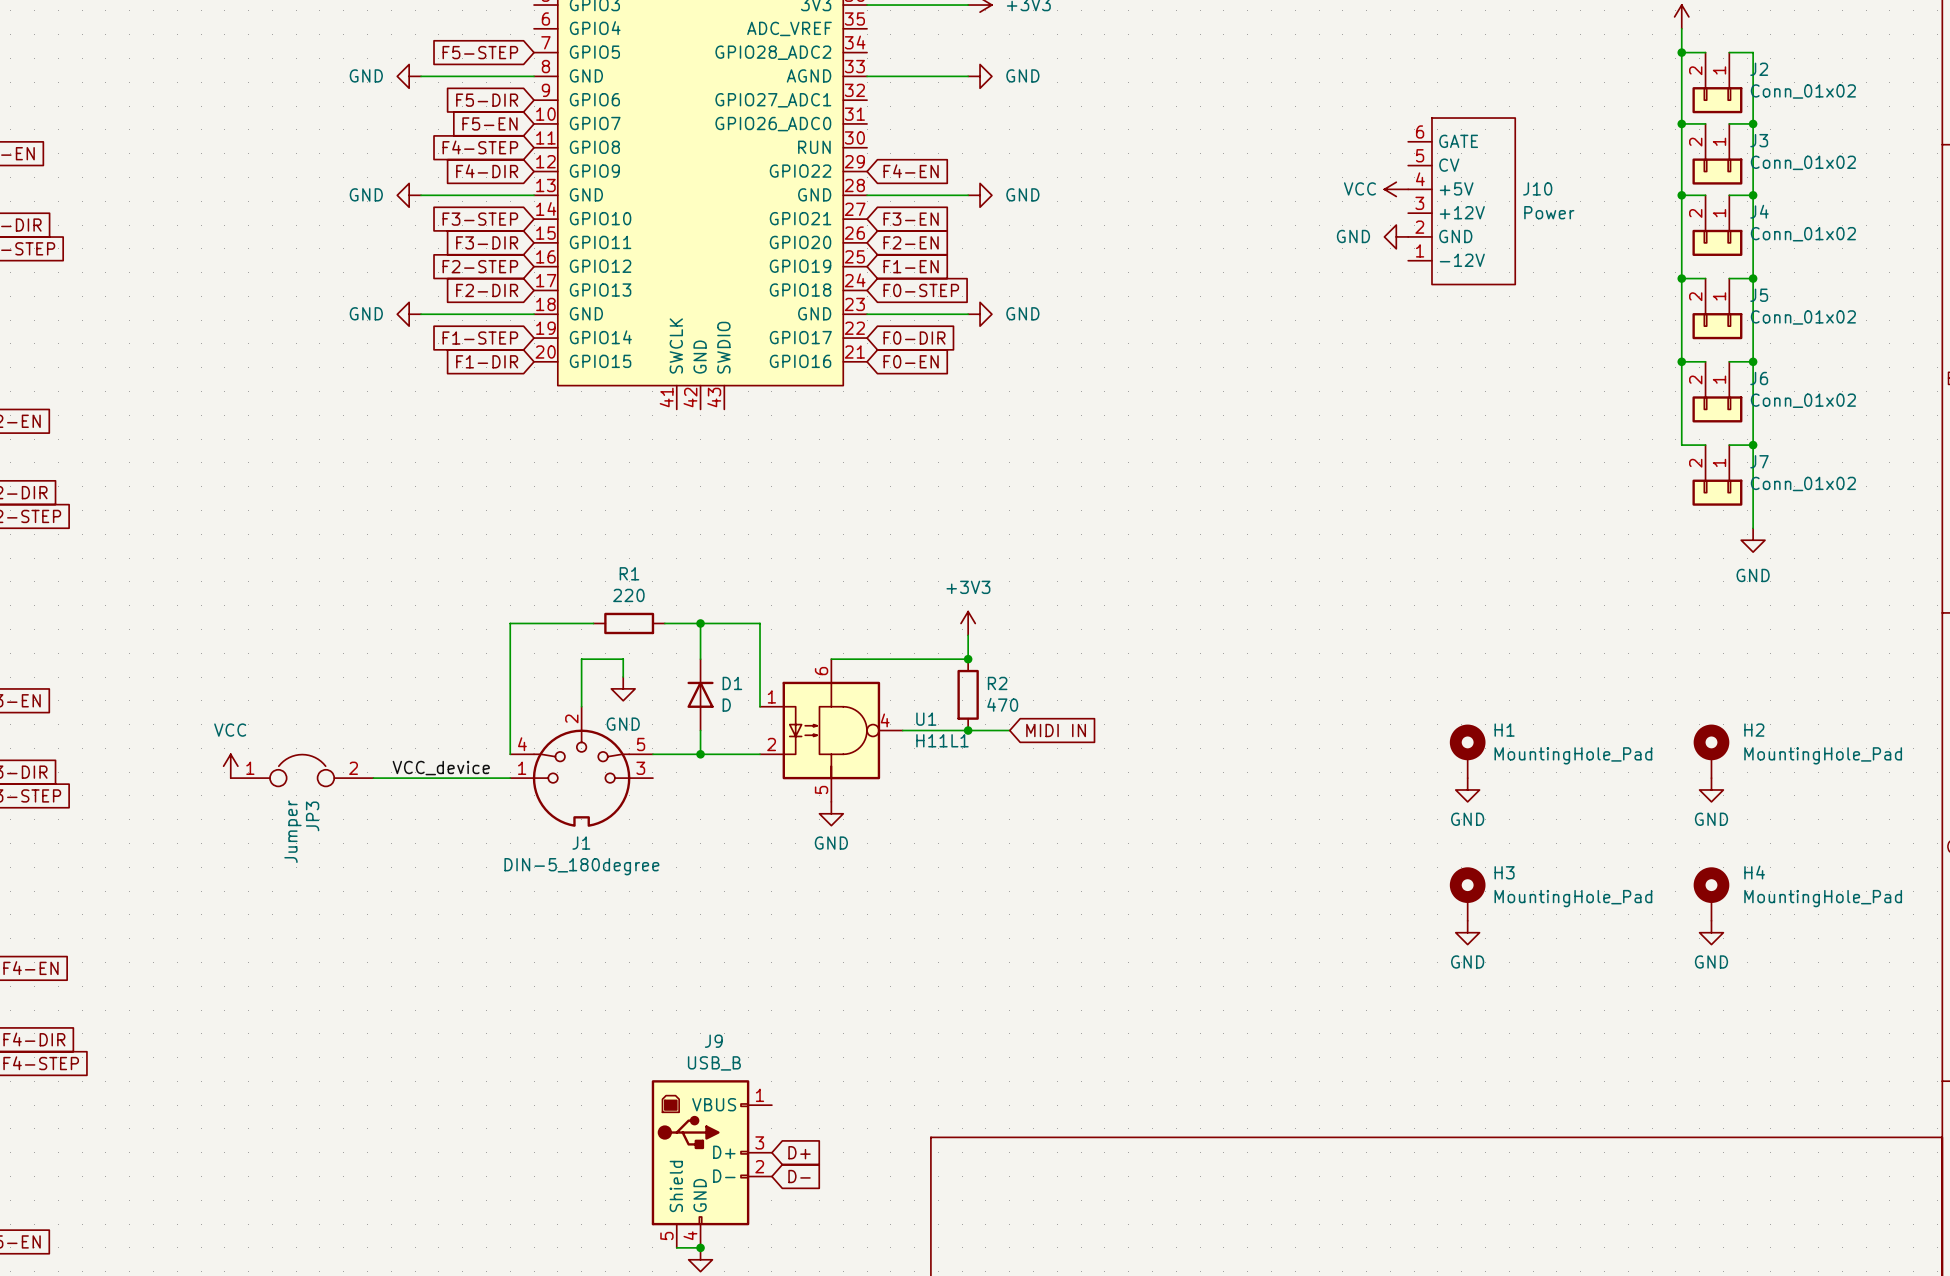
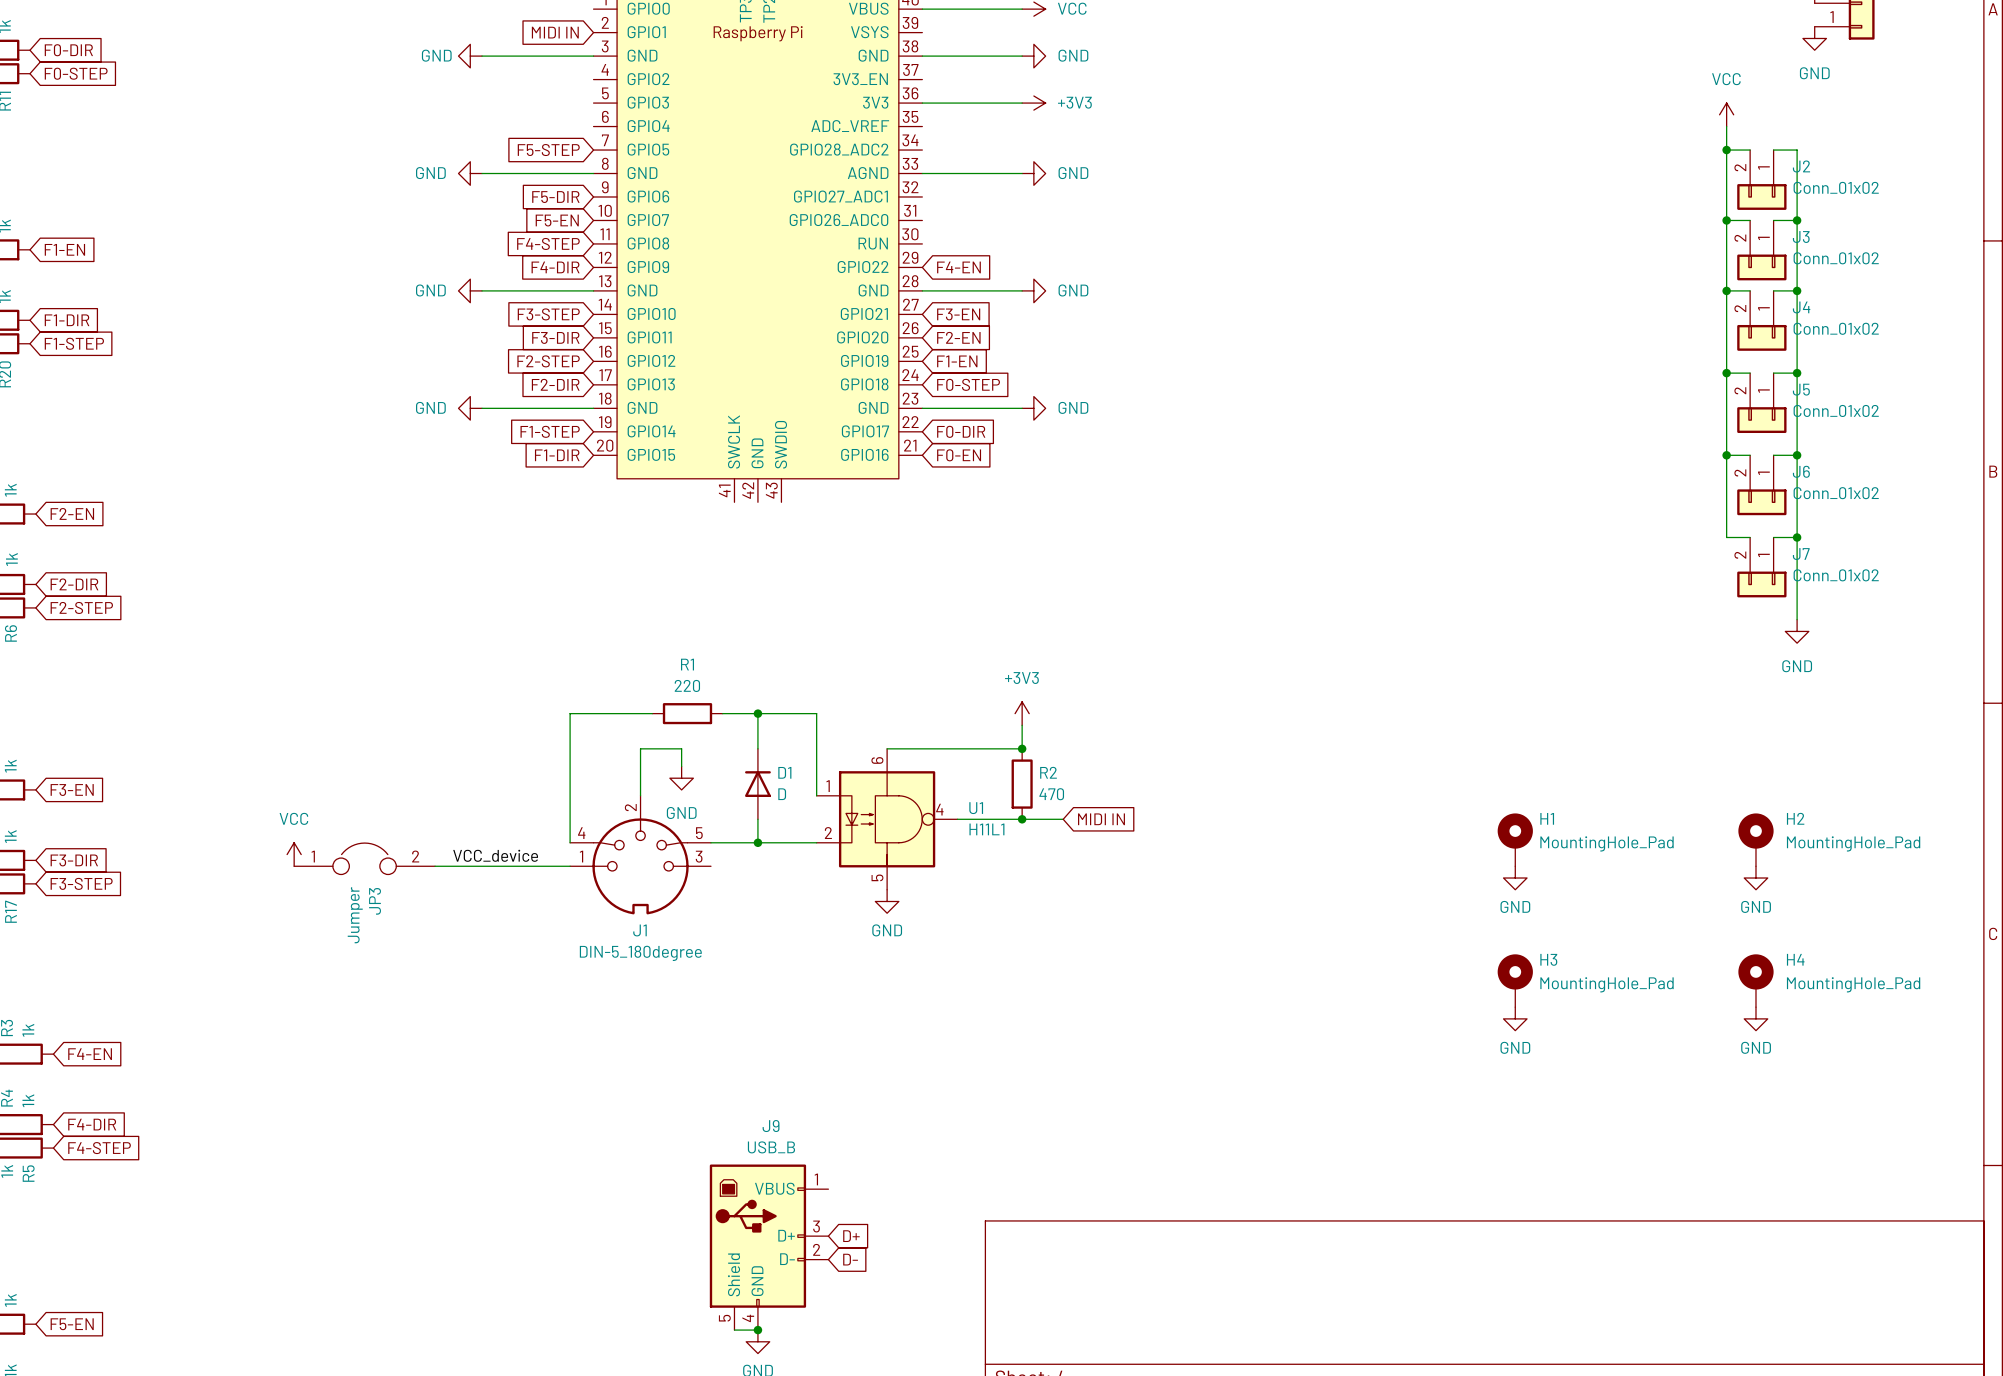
power symbol: VCC (1396, 189) -> none
J10: Power (1461, 201) -> none
power symbol: GND (1396, 236) -> none

